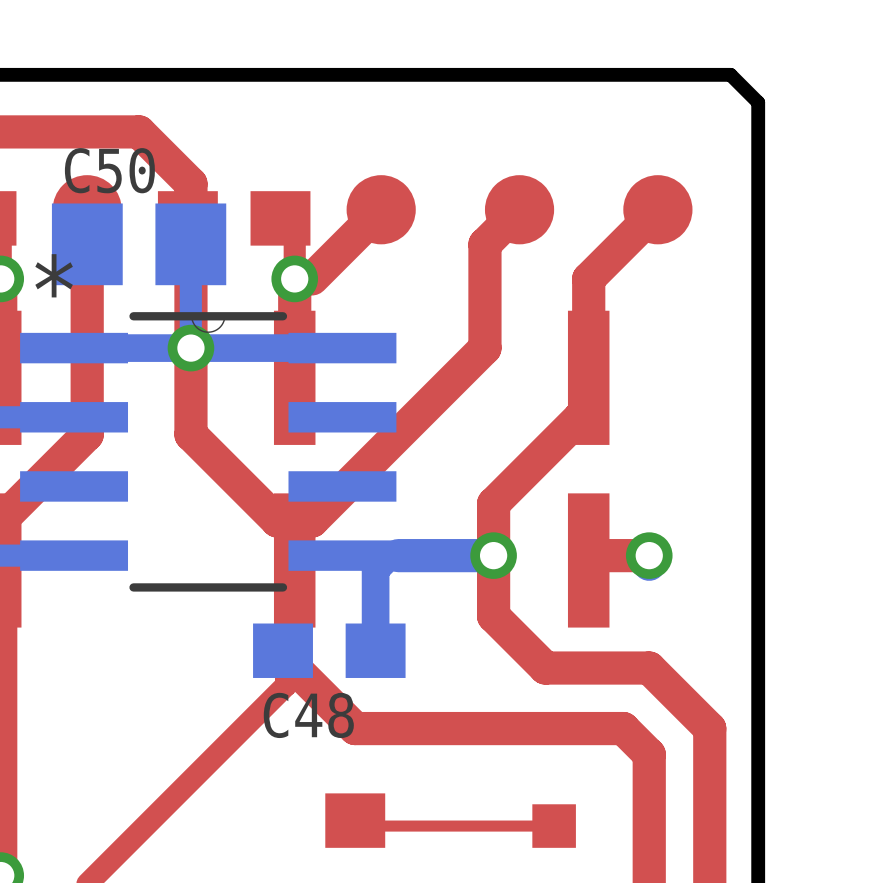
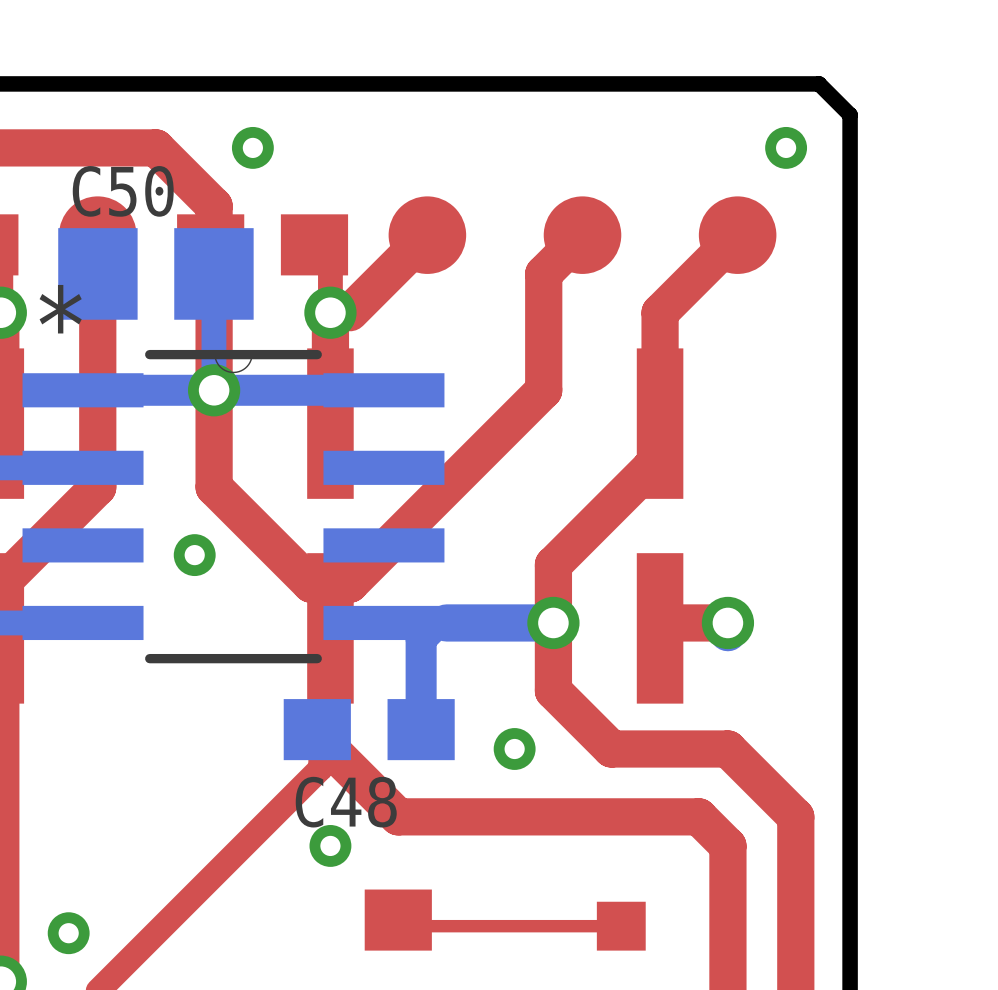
via: none -> (252, 147)
via: none -> (786, 147)
via: none -> (194, 555)
via: none -> (514, 748)
via: none -> (330, 845)
via: none -> (68, 933)

